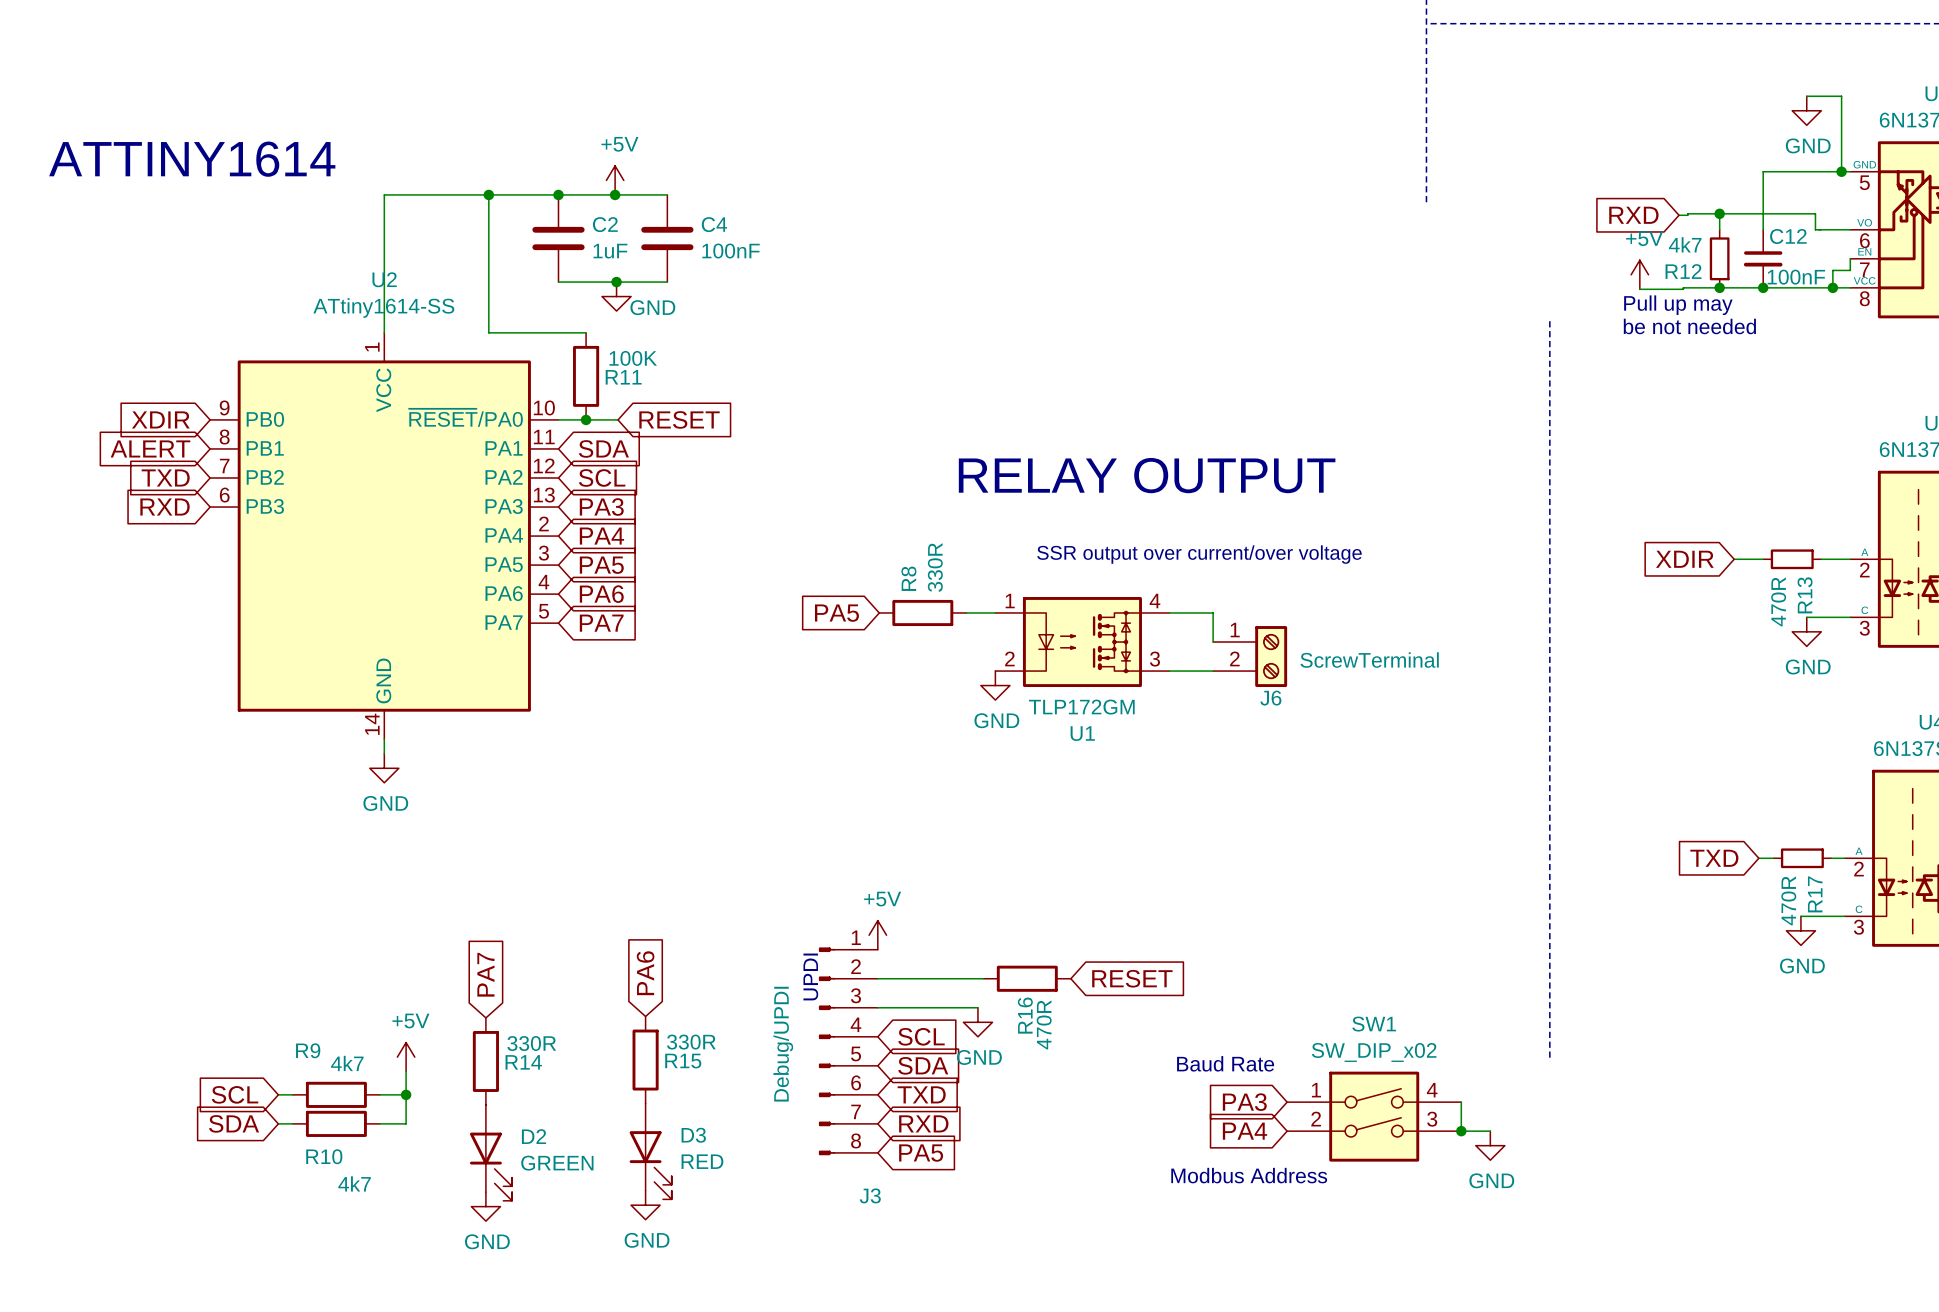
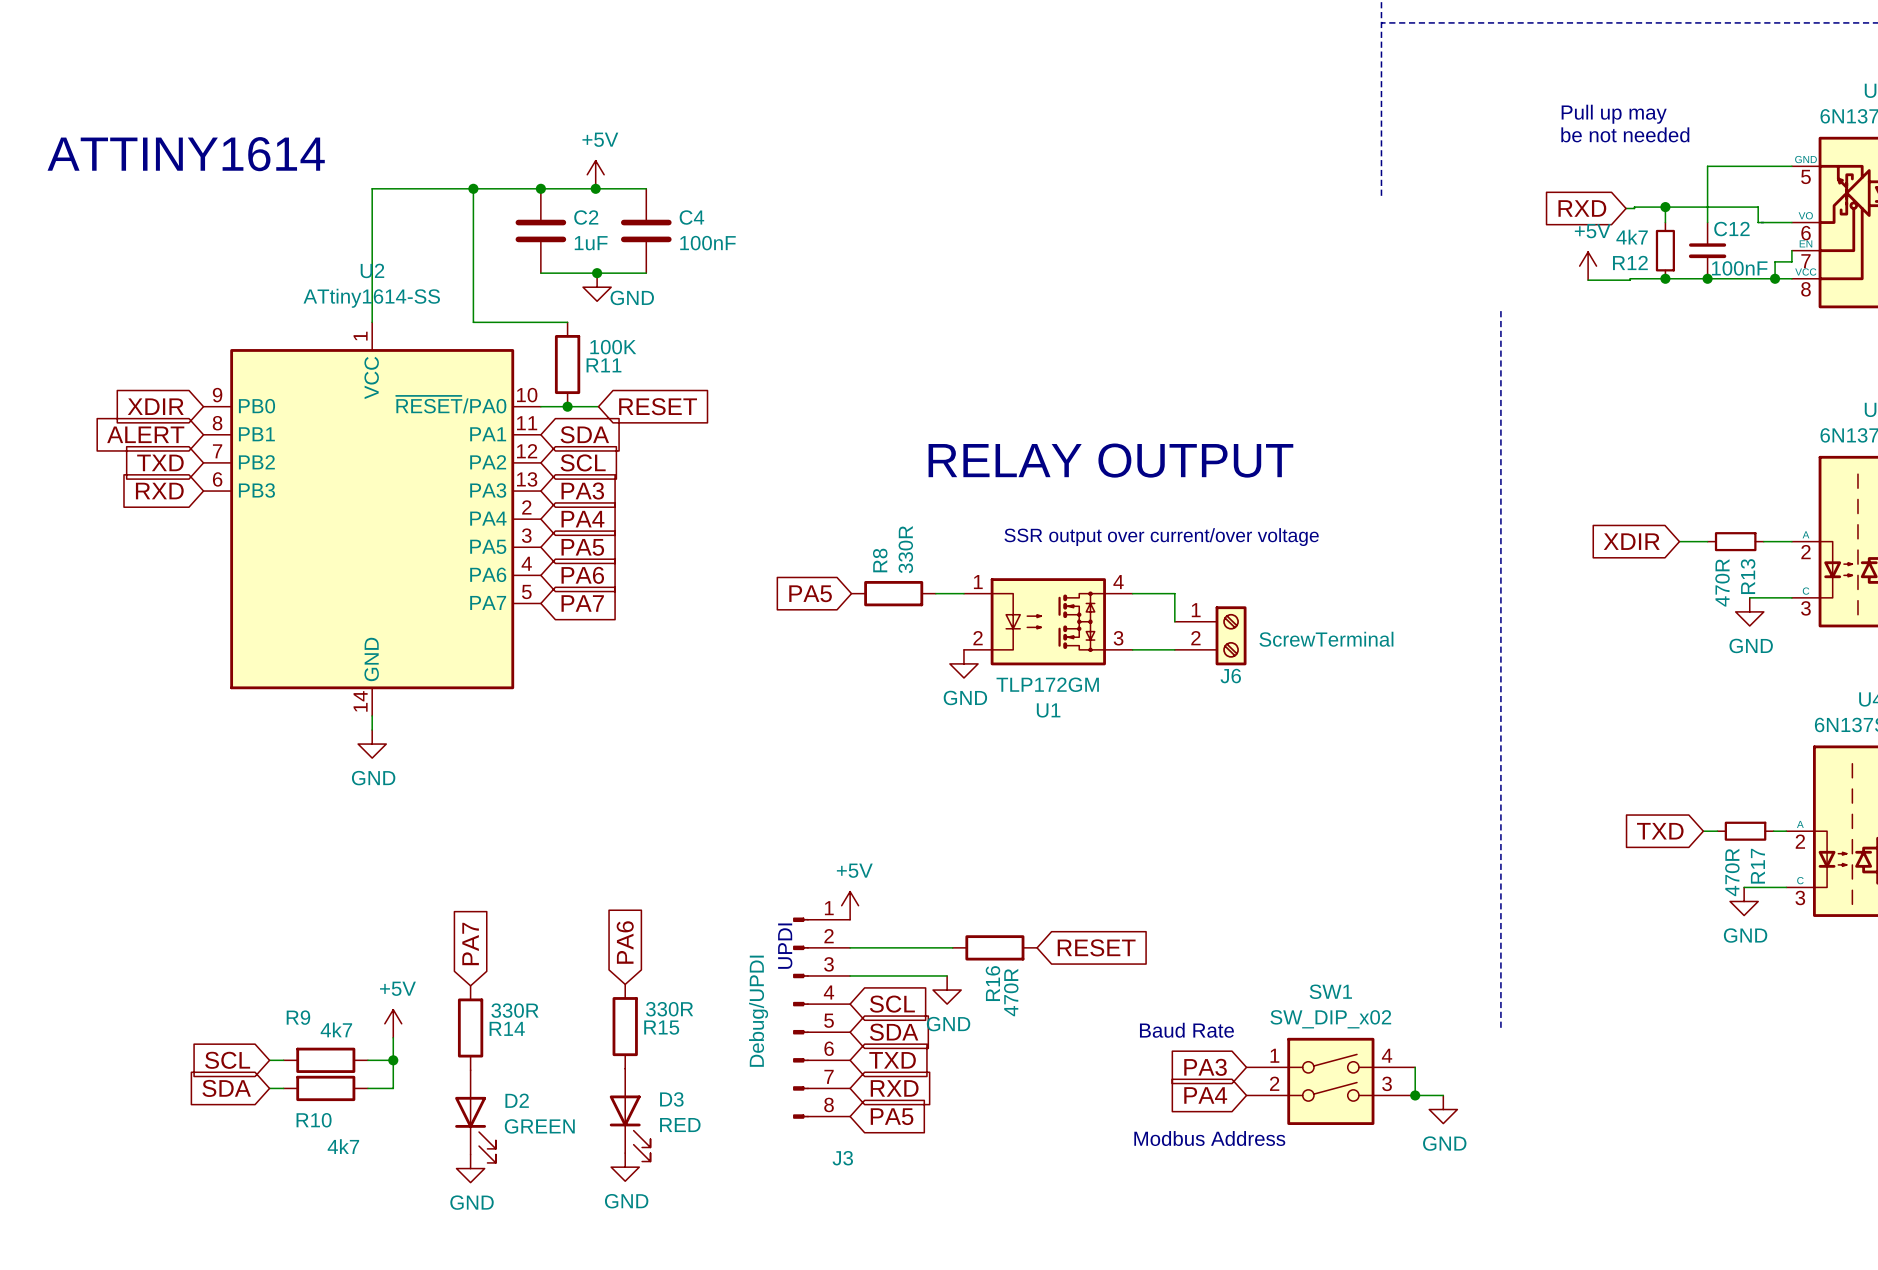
wire: (1806, 96) (1841, 96) (1841, 171) -> none
power symbol: GND (1806, 110) -> none
junction: (1841, 171) -> none
text position: Pull up may (1678, 305) -> Pull up may (1614, 114)
text position: be not needed (1689, 326) -> be not needed (1625, 134)

